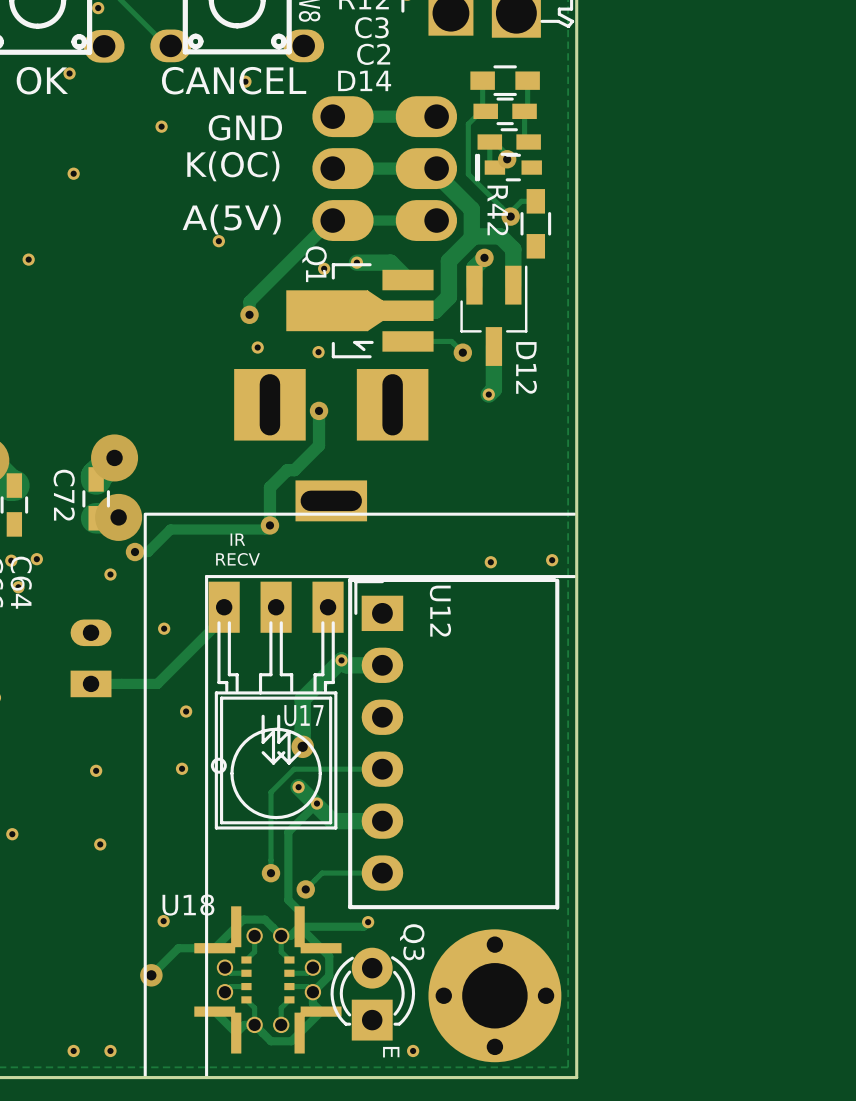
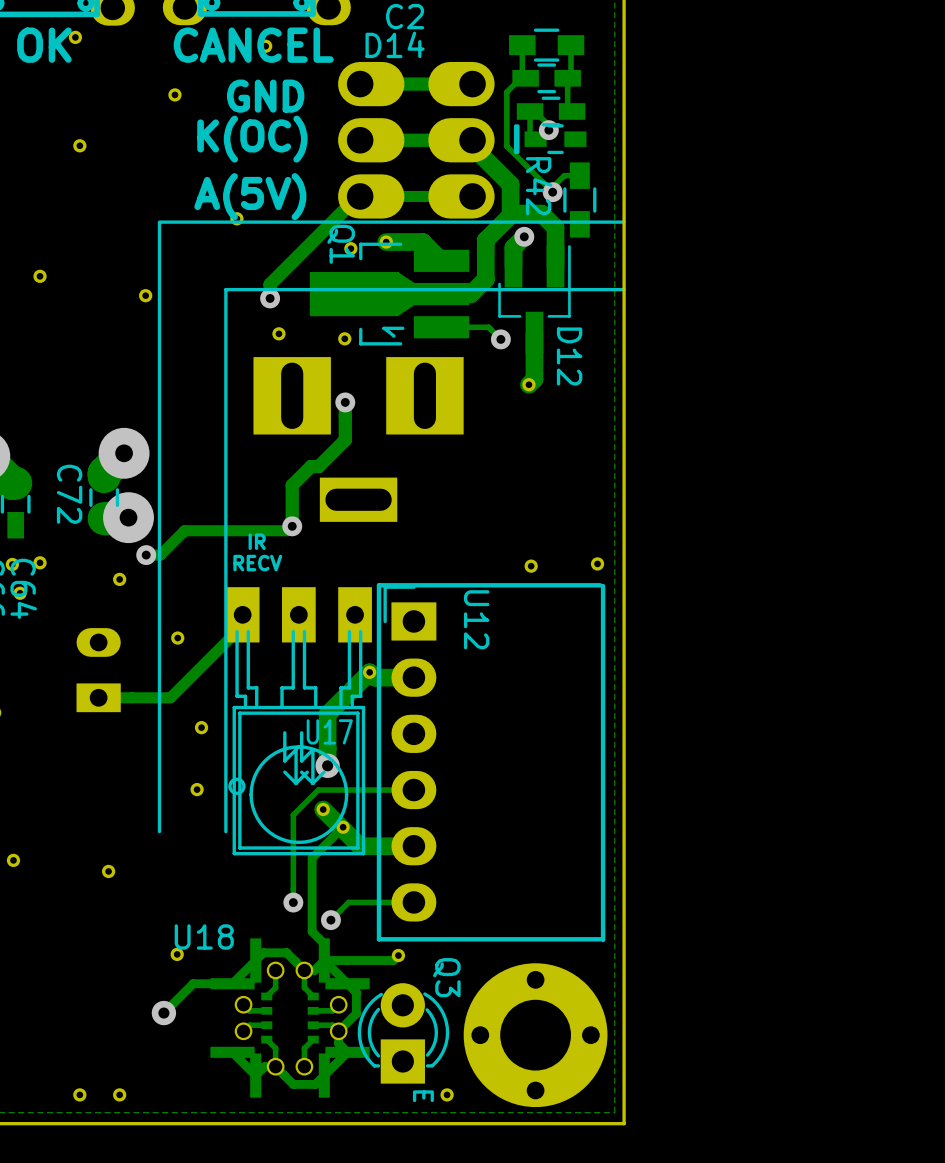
part position: (28, 259) -> (40, 276)
part: none -> (145, 295)
line: (574, 514) (145, 514) -> (624, 222) (159, 222)
line: (145, 515) (145, 1077) -> (159, 223) (159, 831)
line: (574, 576) (206, 576) (206, 1077) -> (624, 289) (225, 289) (225, 831)
part: (96, 770) -> none

